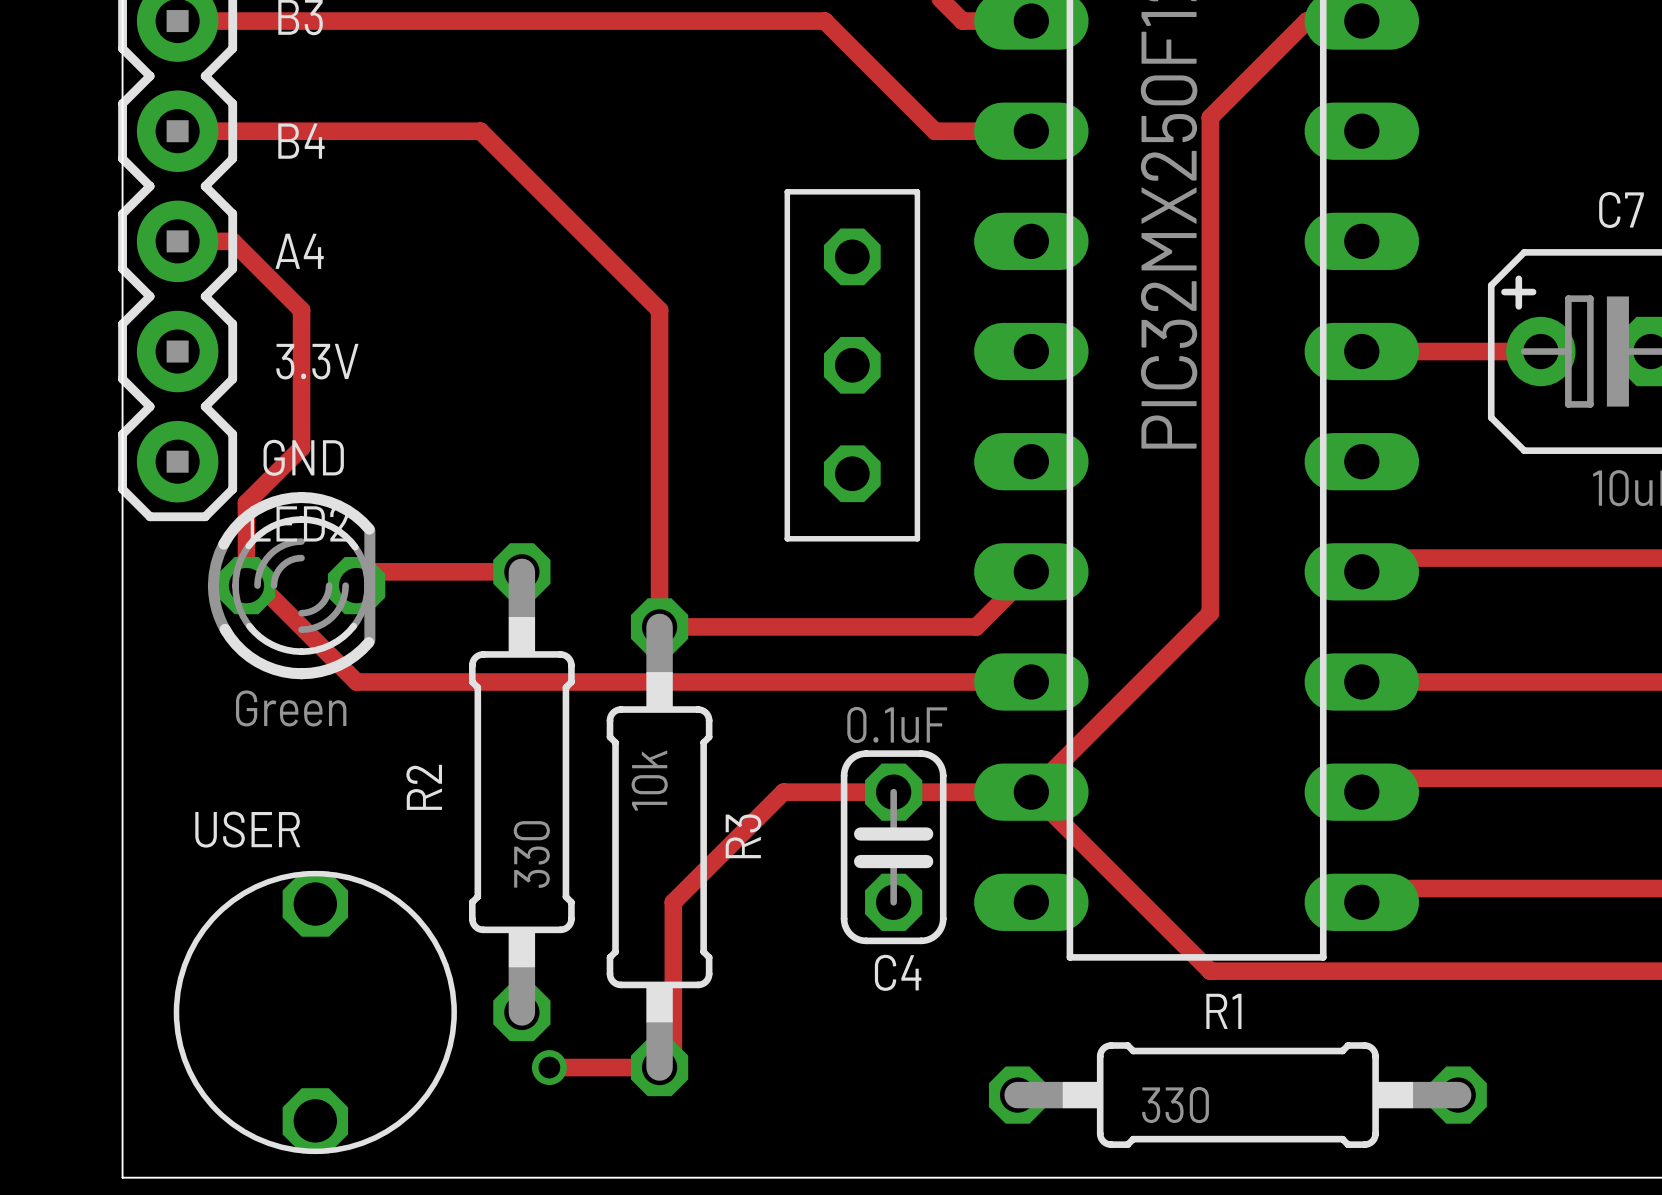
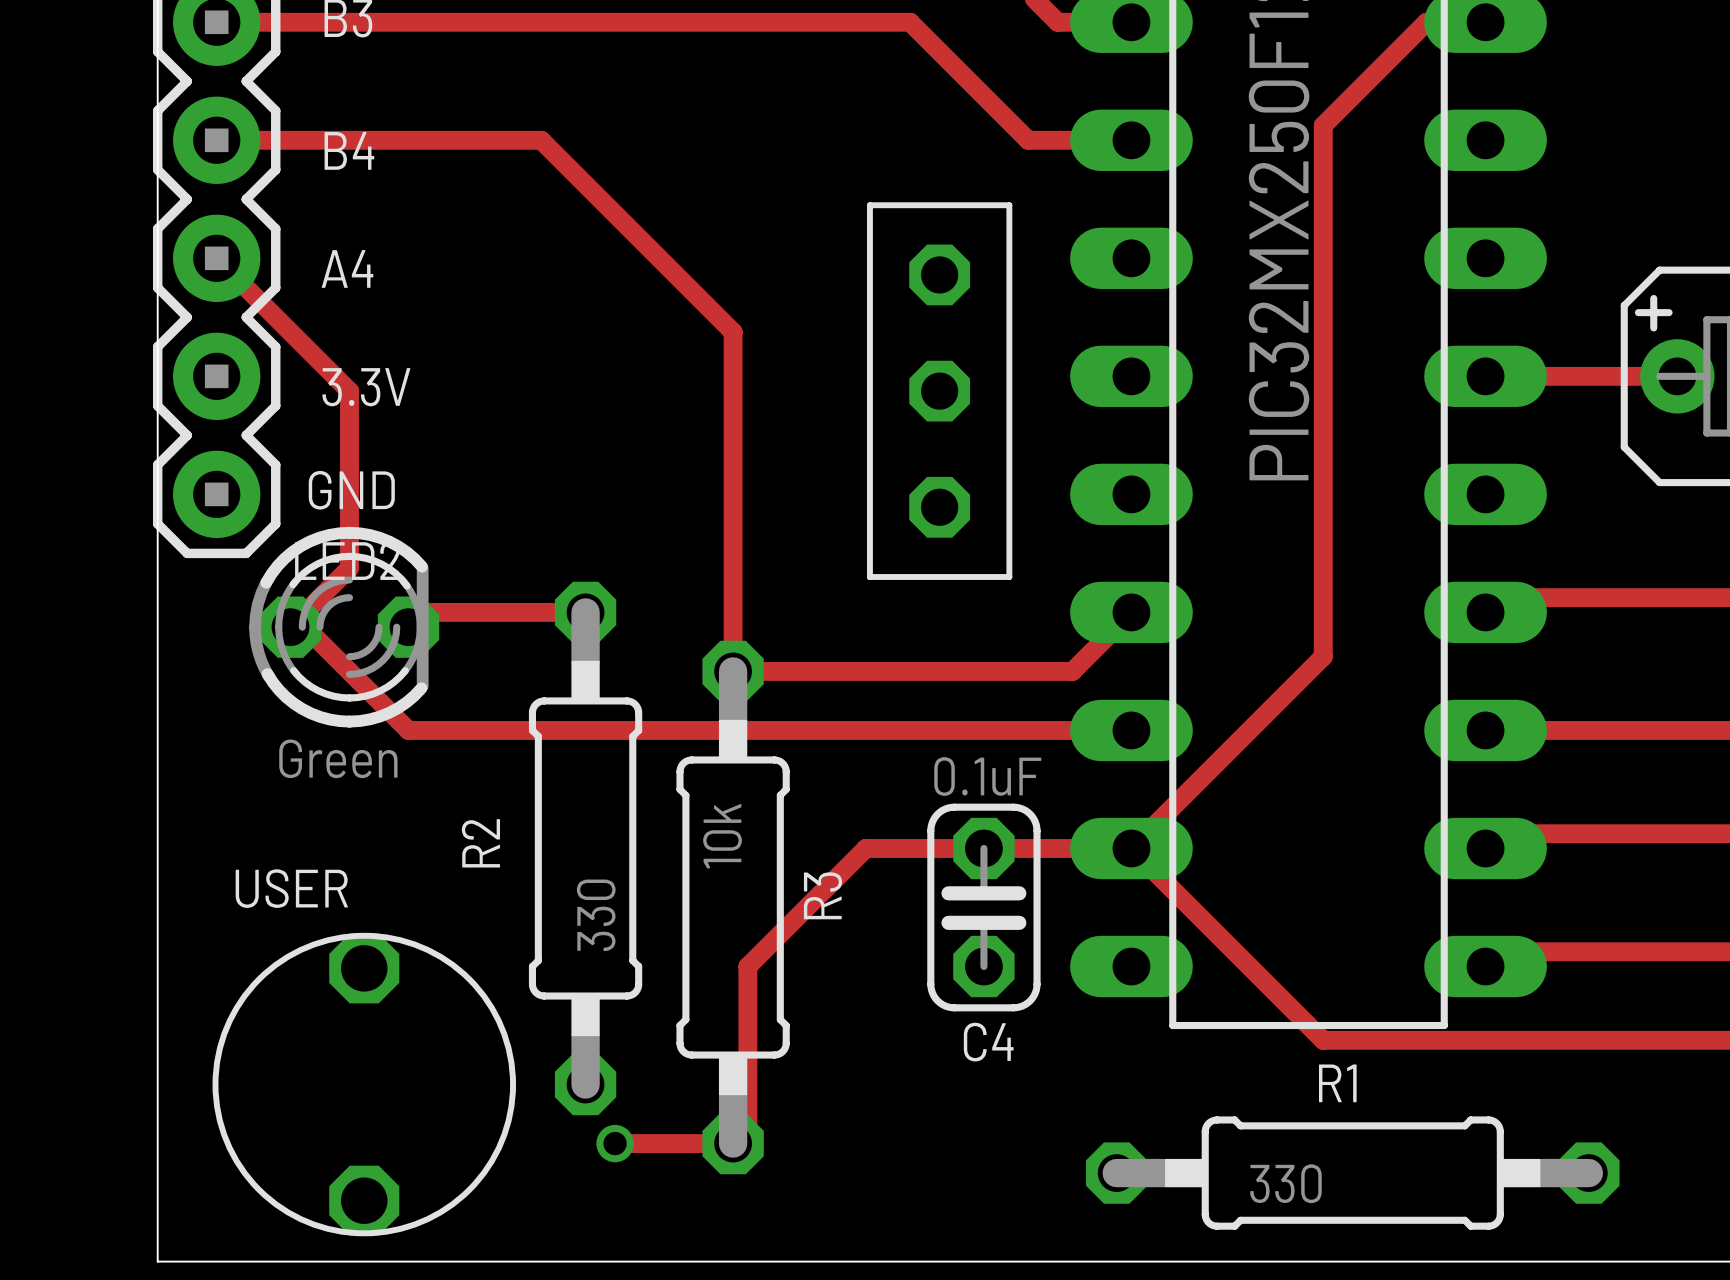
track: (177, 241) (232, 241) (301, 310) (301, 365) -> (216, 258) (349, 391)
track: (301, 447) (246, 502) (246, 585) -> (349, 479) (349, 568) (290, 627) (305, 627)

